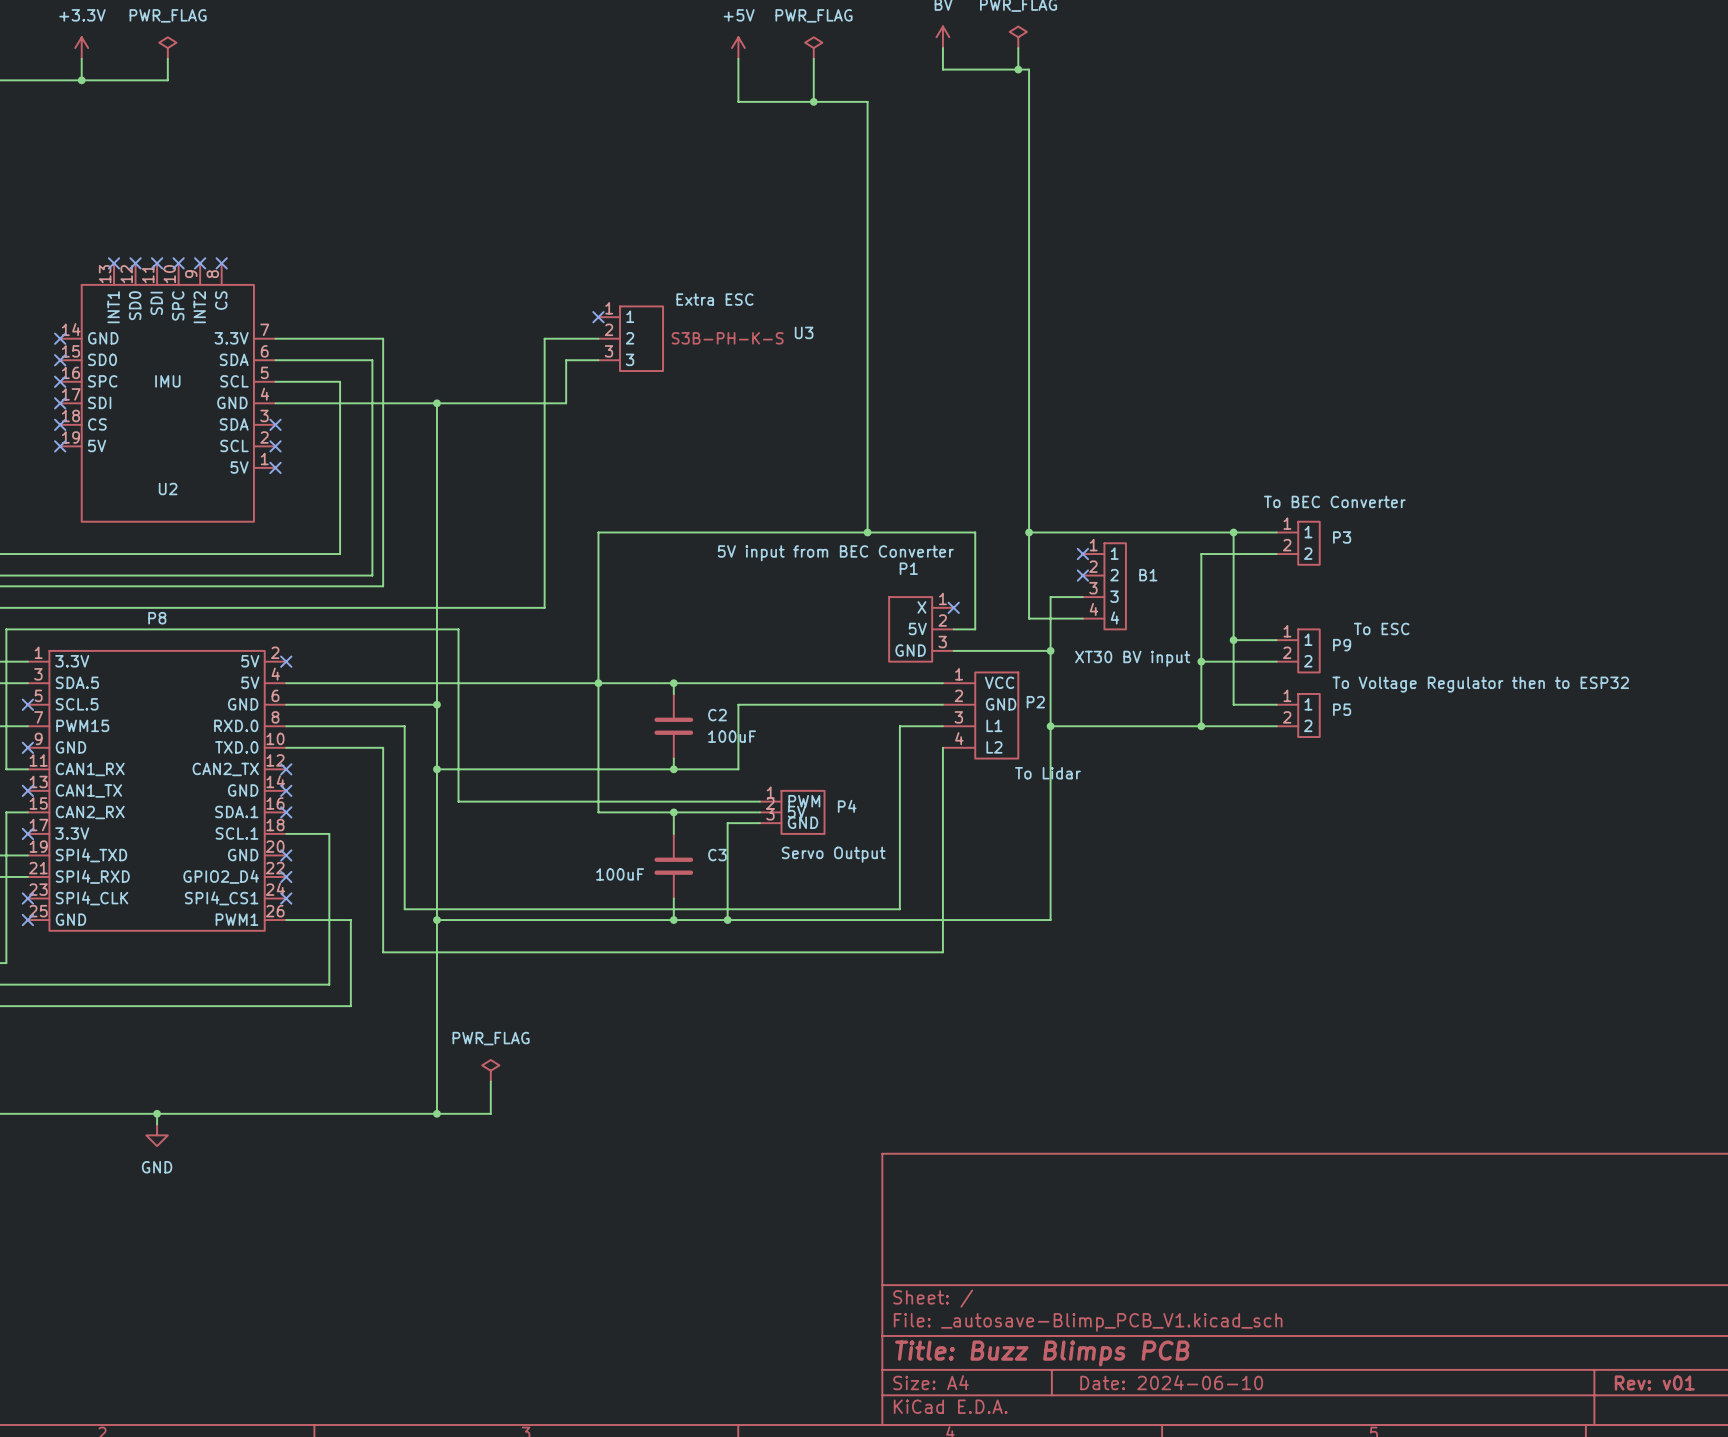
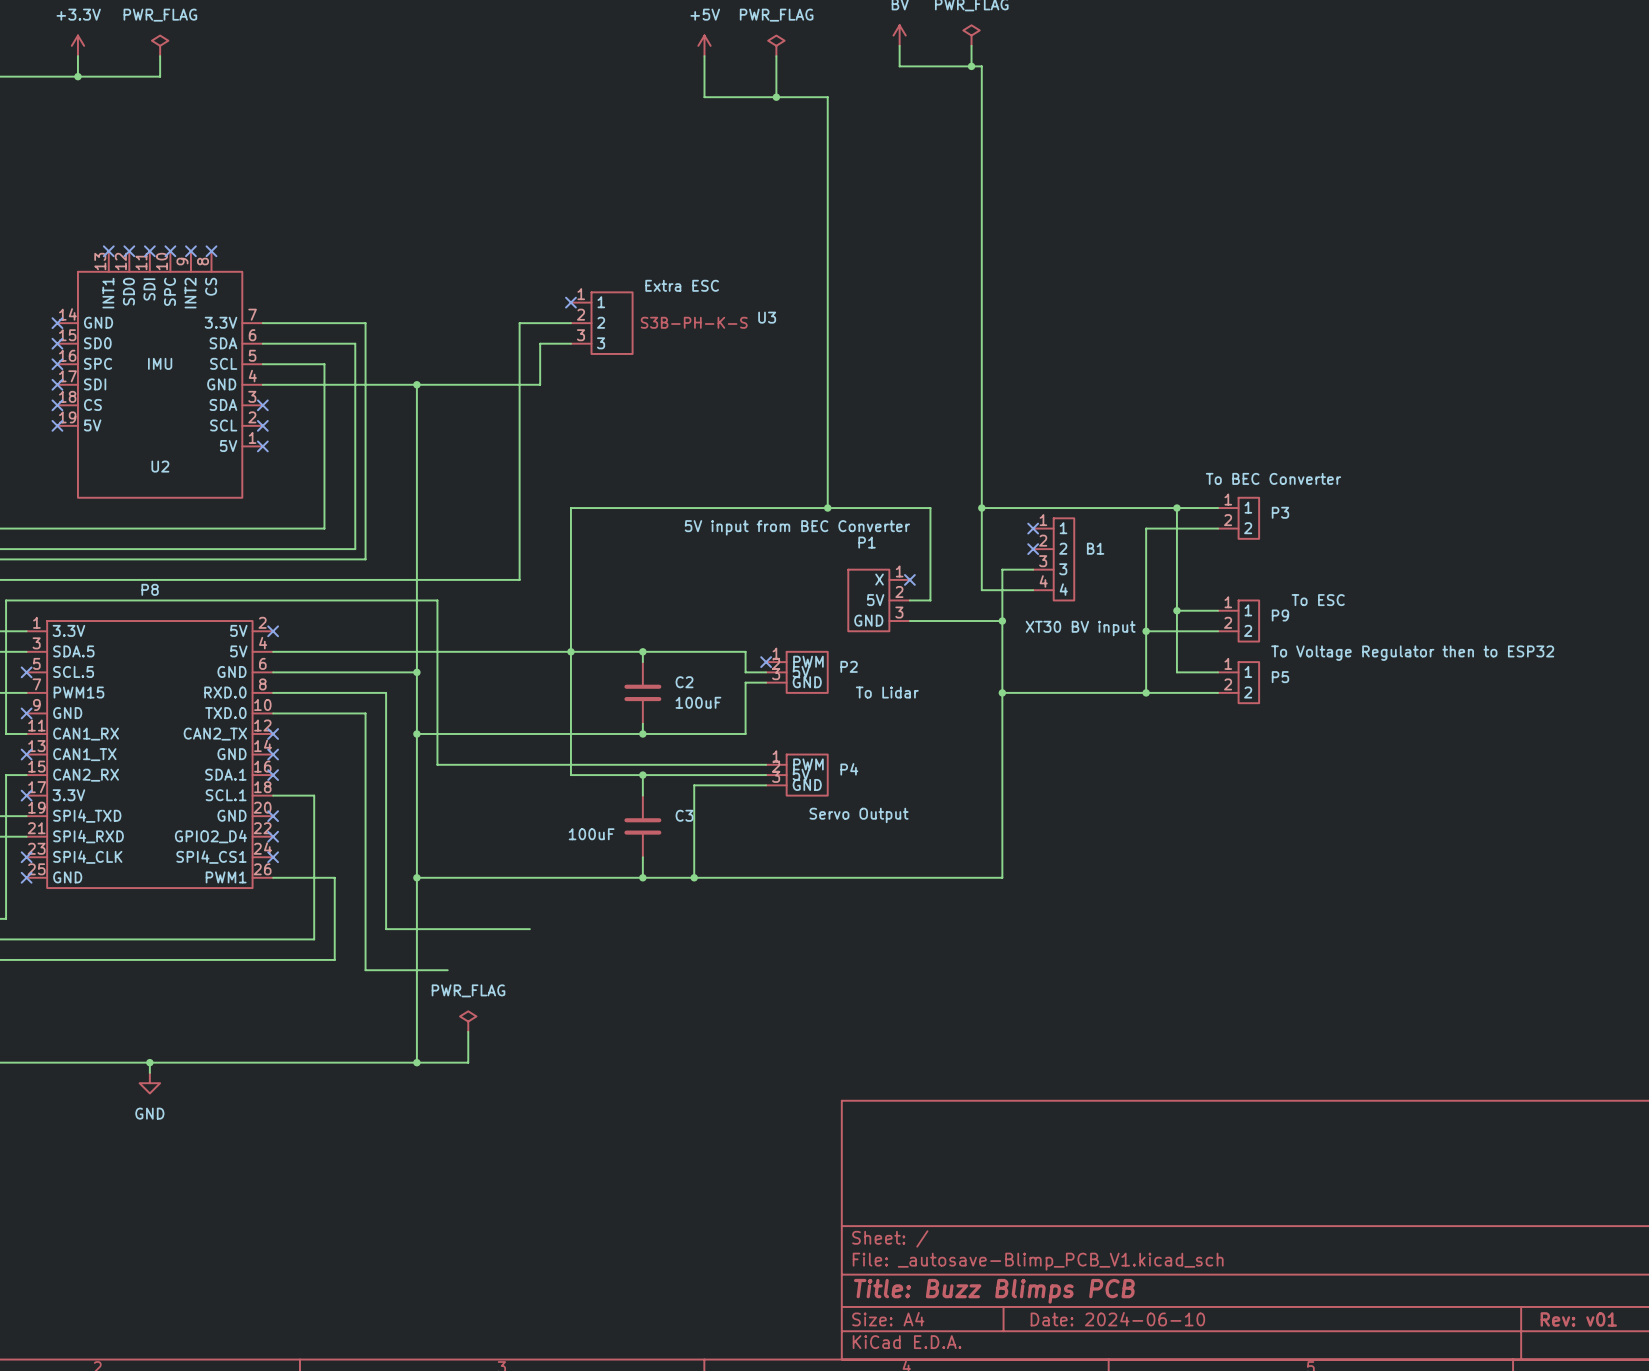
P2 symbol: [942, 672, 1019, 759] -> [766, 651, 828, 693]
wire: (781, 683) (942, 683) -> (745, 651) (745, 672)
no-connect mark: none -> (766, 662)
wire: (781, 704) (738, 704) (738, 769) -> (766, 682) (745, 682) (745, 733) (704, 733)
wire: (803, 704) (942, 704) -> none
wire: (942, 726) (899, 726) (899, 909) (404, 909) -> (529, 929) (386, 929) (386, 867)
wire: (942, 747) (942, 952) (383, 952) -> (447, 970) (365, 970) (365, 908)
P2 text position: To Lidar (1047, 773) -> To Lidar (887, 692)
P4 position: (792, 812) -> (796, 775)
P4 text position: Servo Output (833, 854) -> Servo Output (859, 815)

